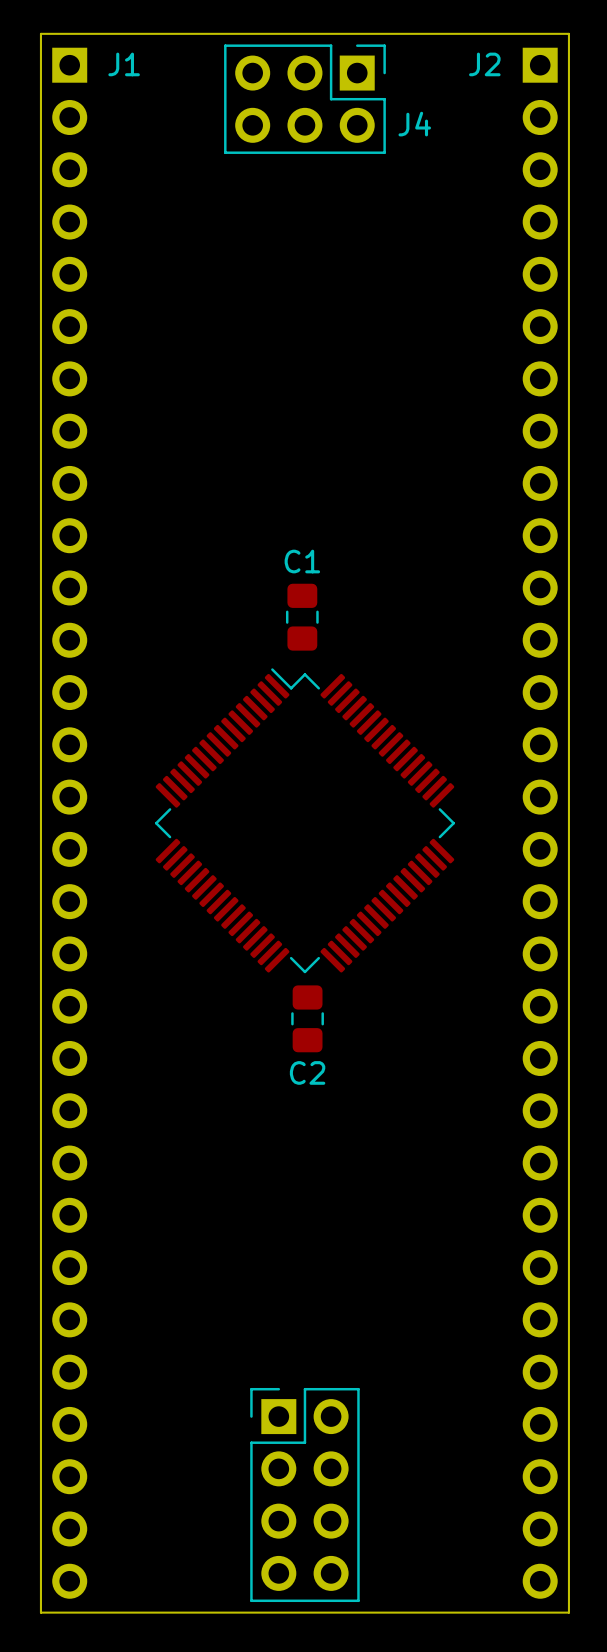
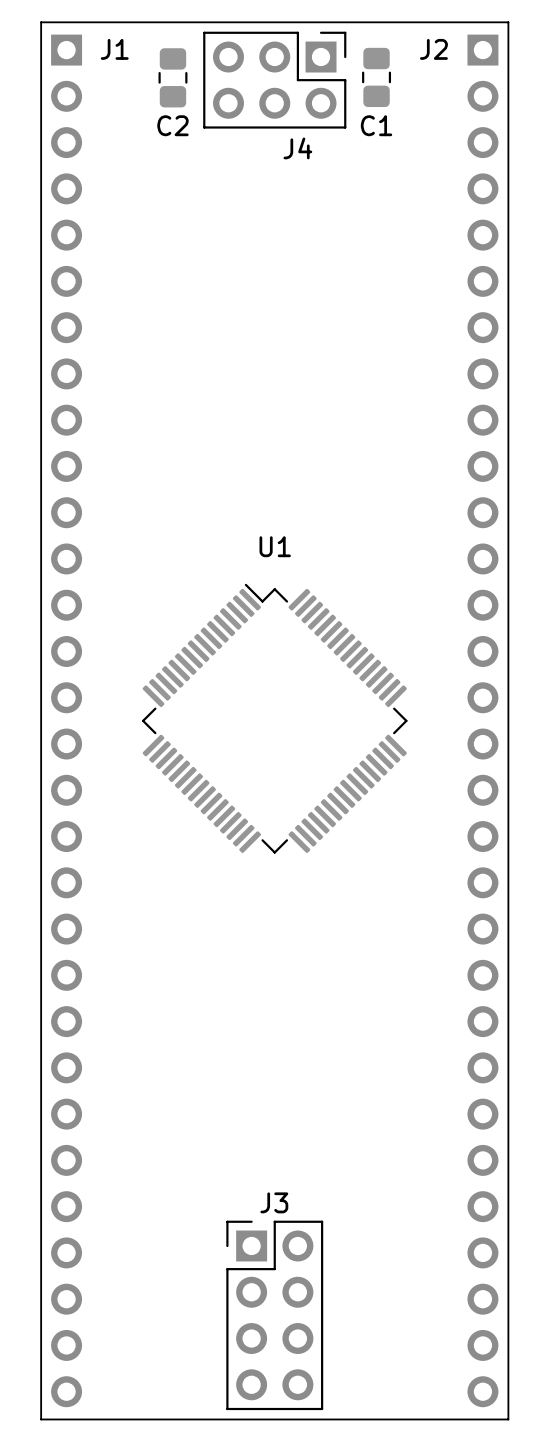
J4 name position: J4 (414, 124) -> J4 (297, 148)
C1 name position: C1 (302, 561) -> C1 (376, 125)
C1 position: (302, 617) -> (376, 77)
U1 name: none -> U1 (275, 546)
C2 position: (307, 1018) -> (172, 77)
J3 name: none -> J3 (274, 1202)

